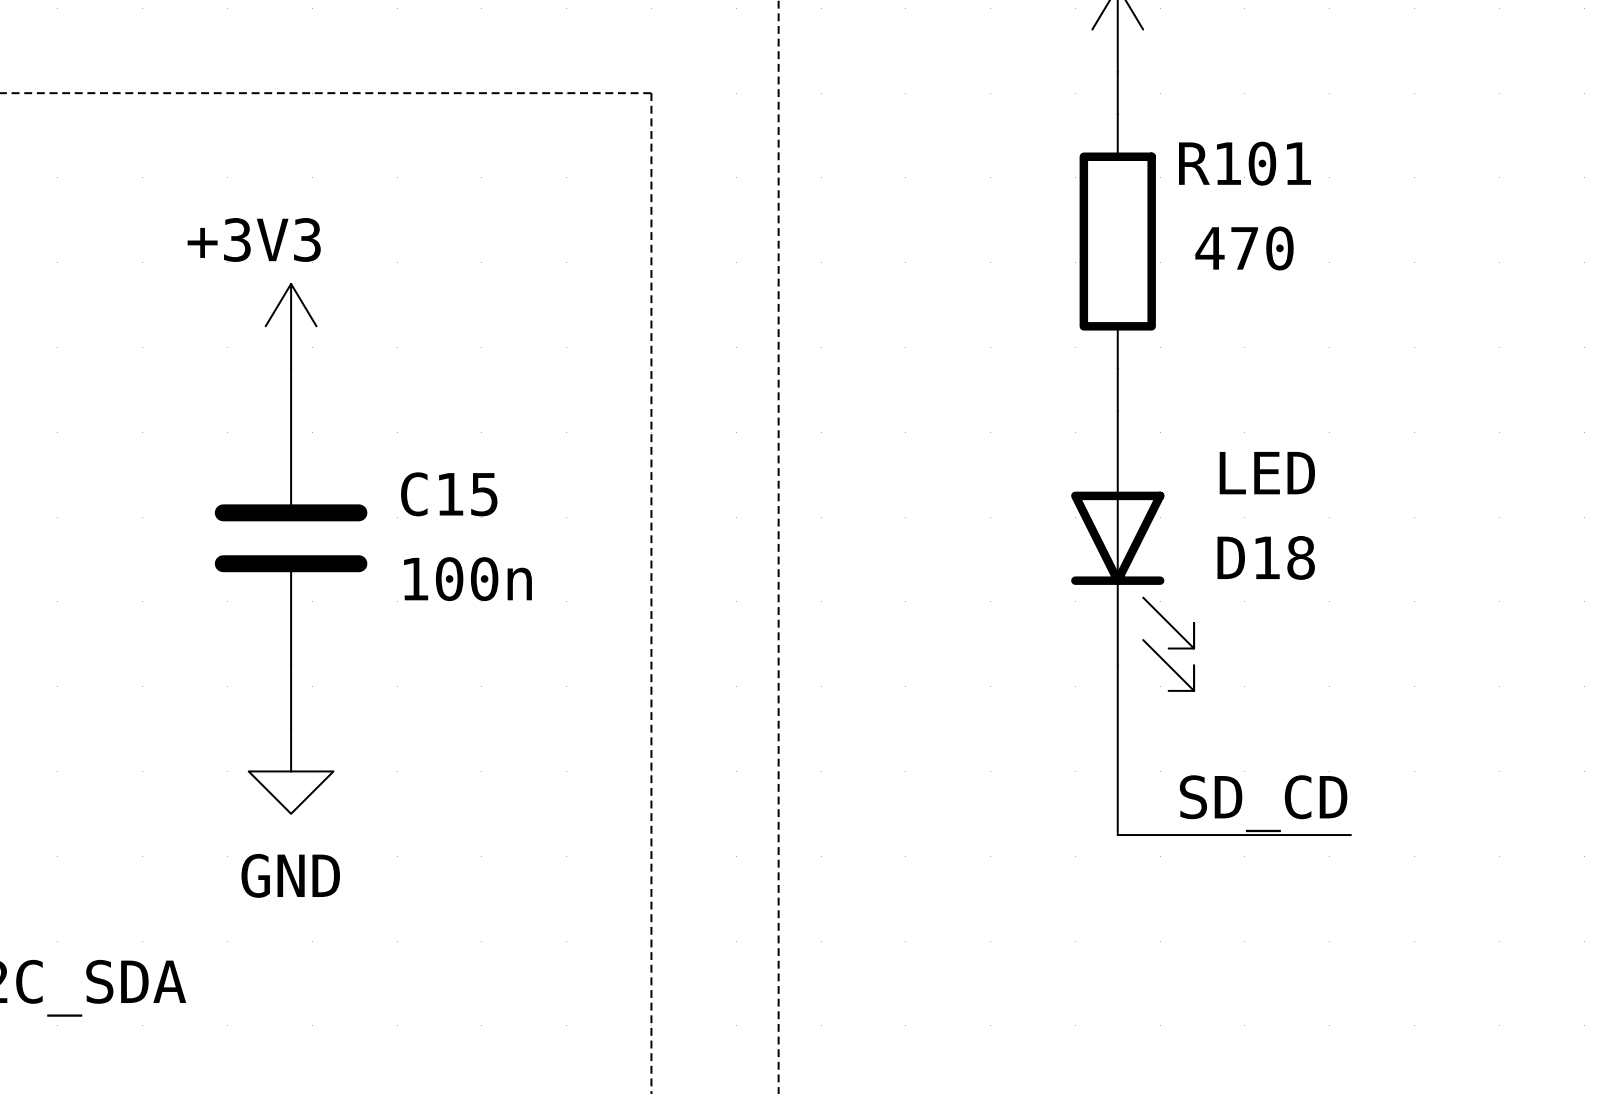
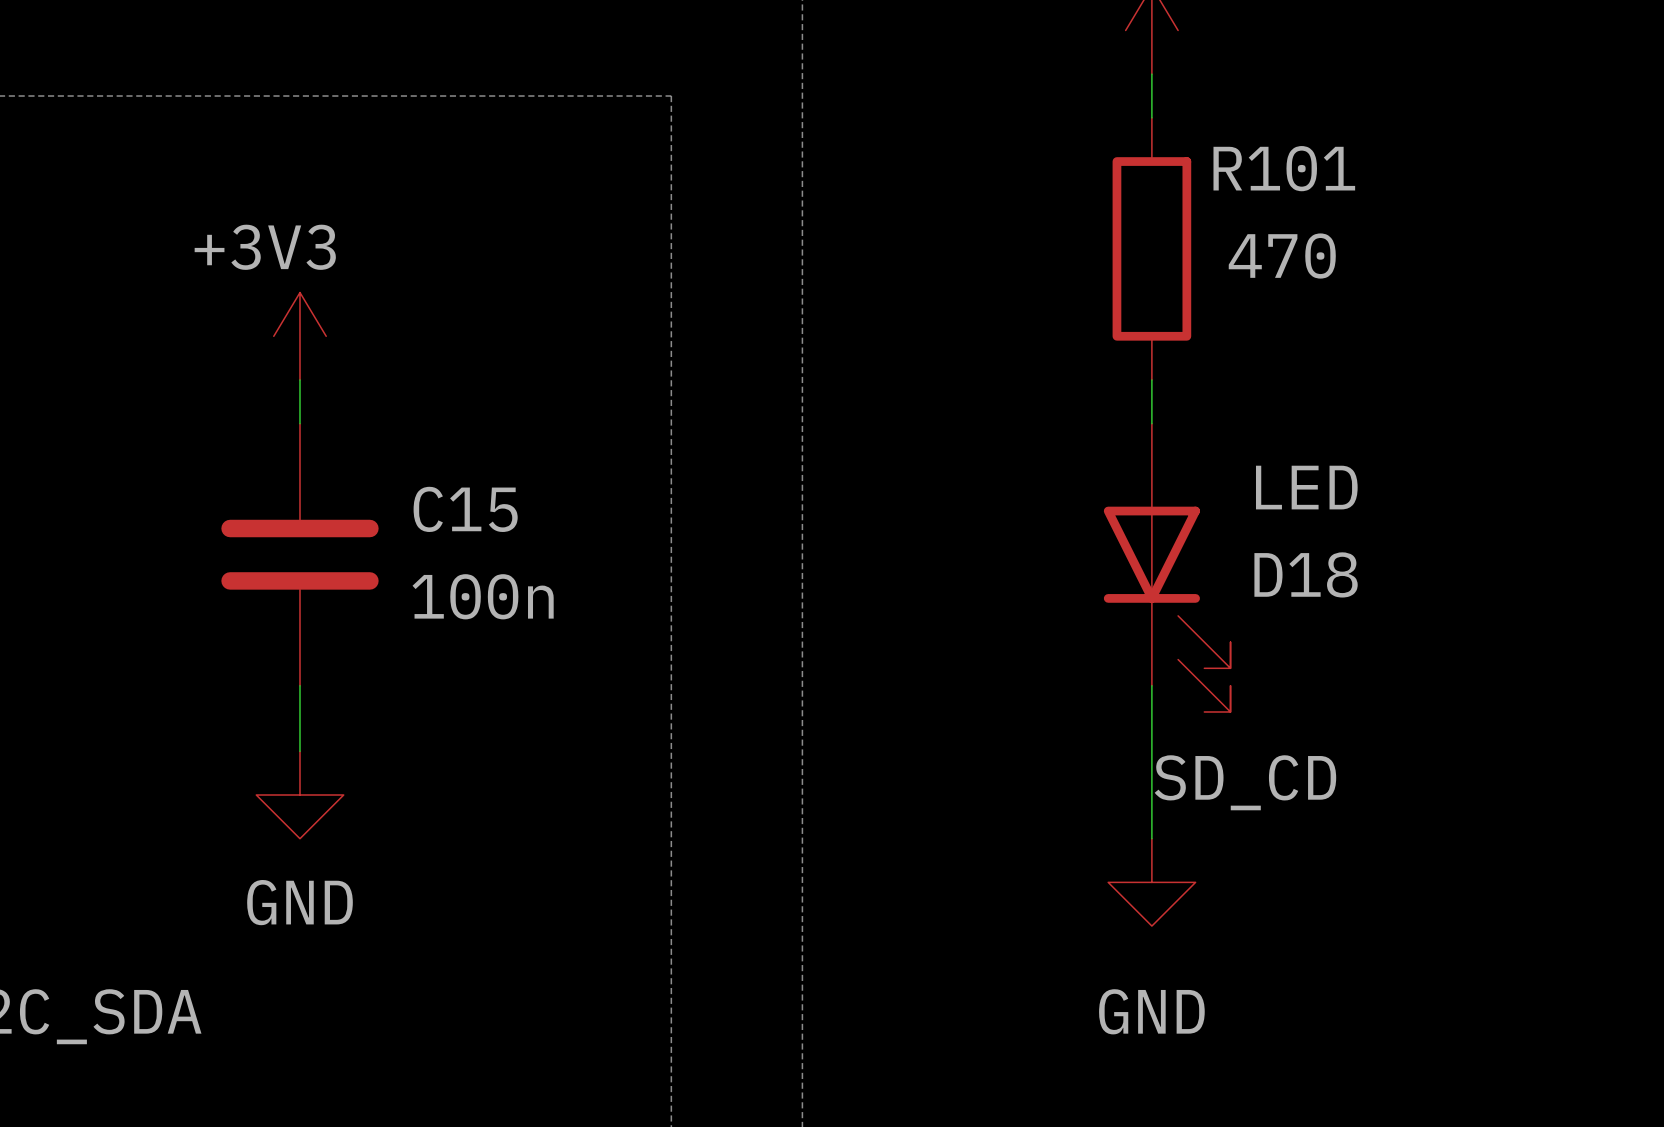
label position: SD_CD (1263, 803) -> SD_CD (1245, 782)
wire: (1117, 813) (1117, 835) (1350, 835) -> none
power symbol: none -> GND (1151, 882)

